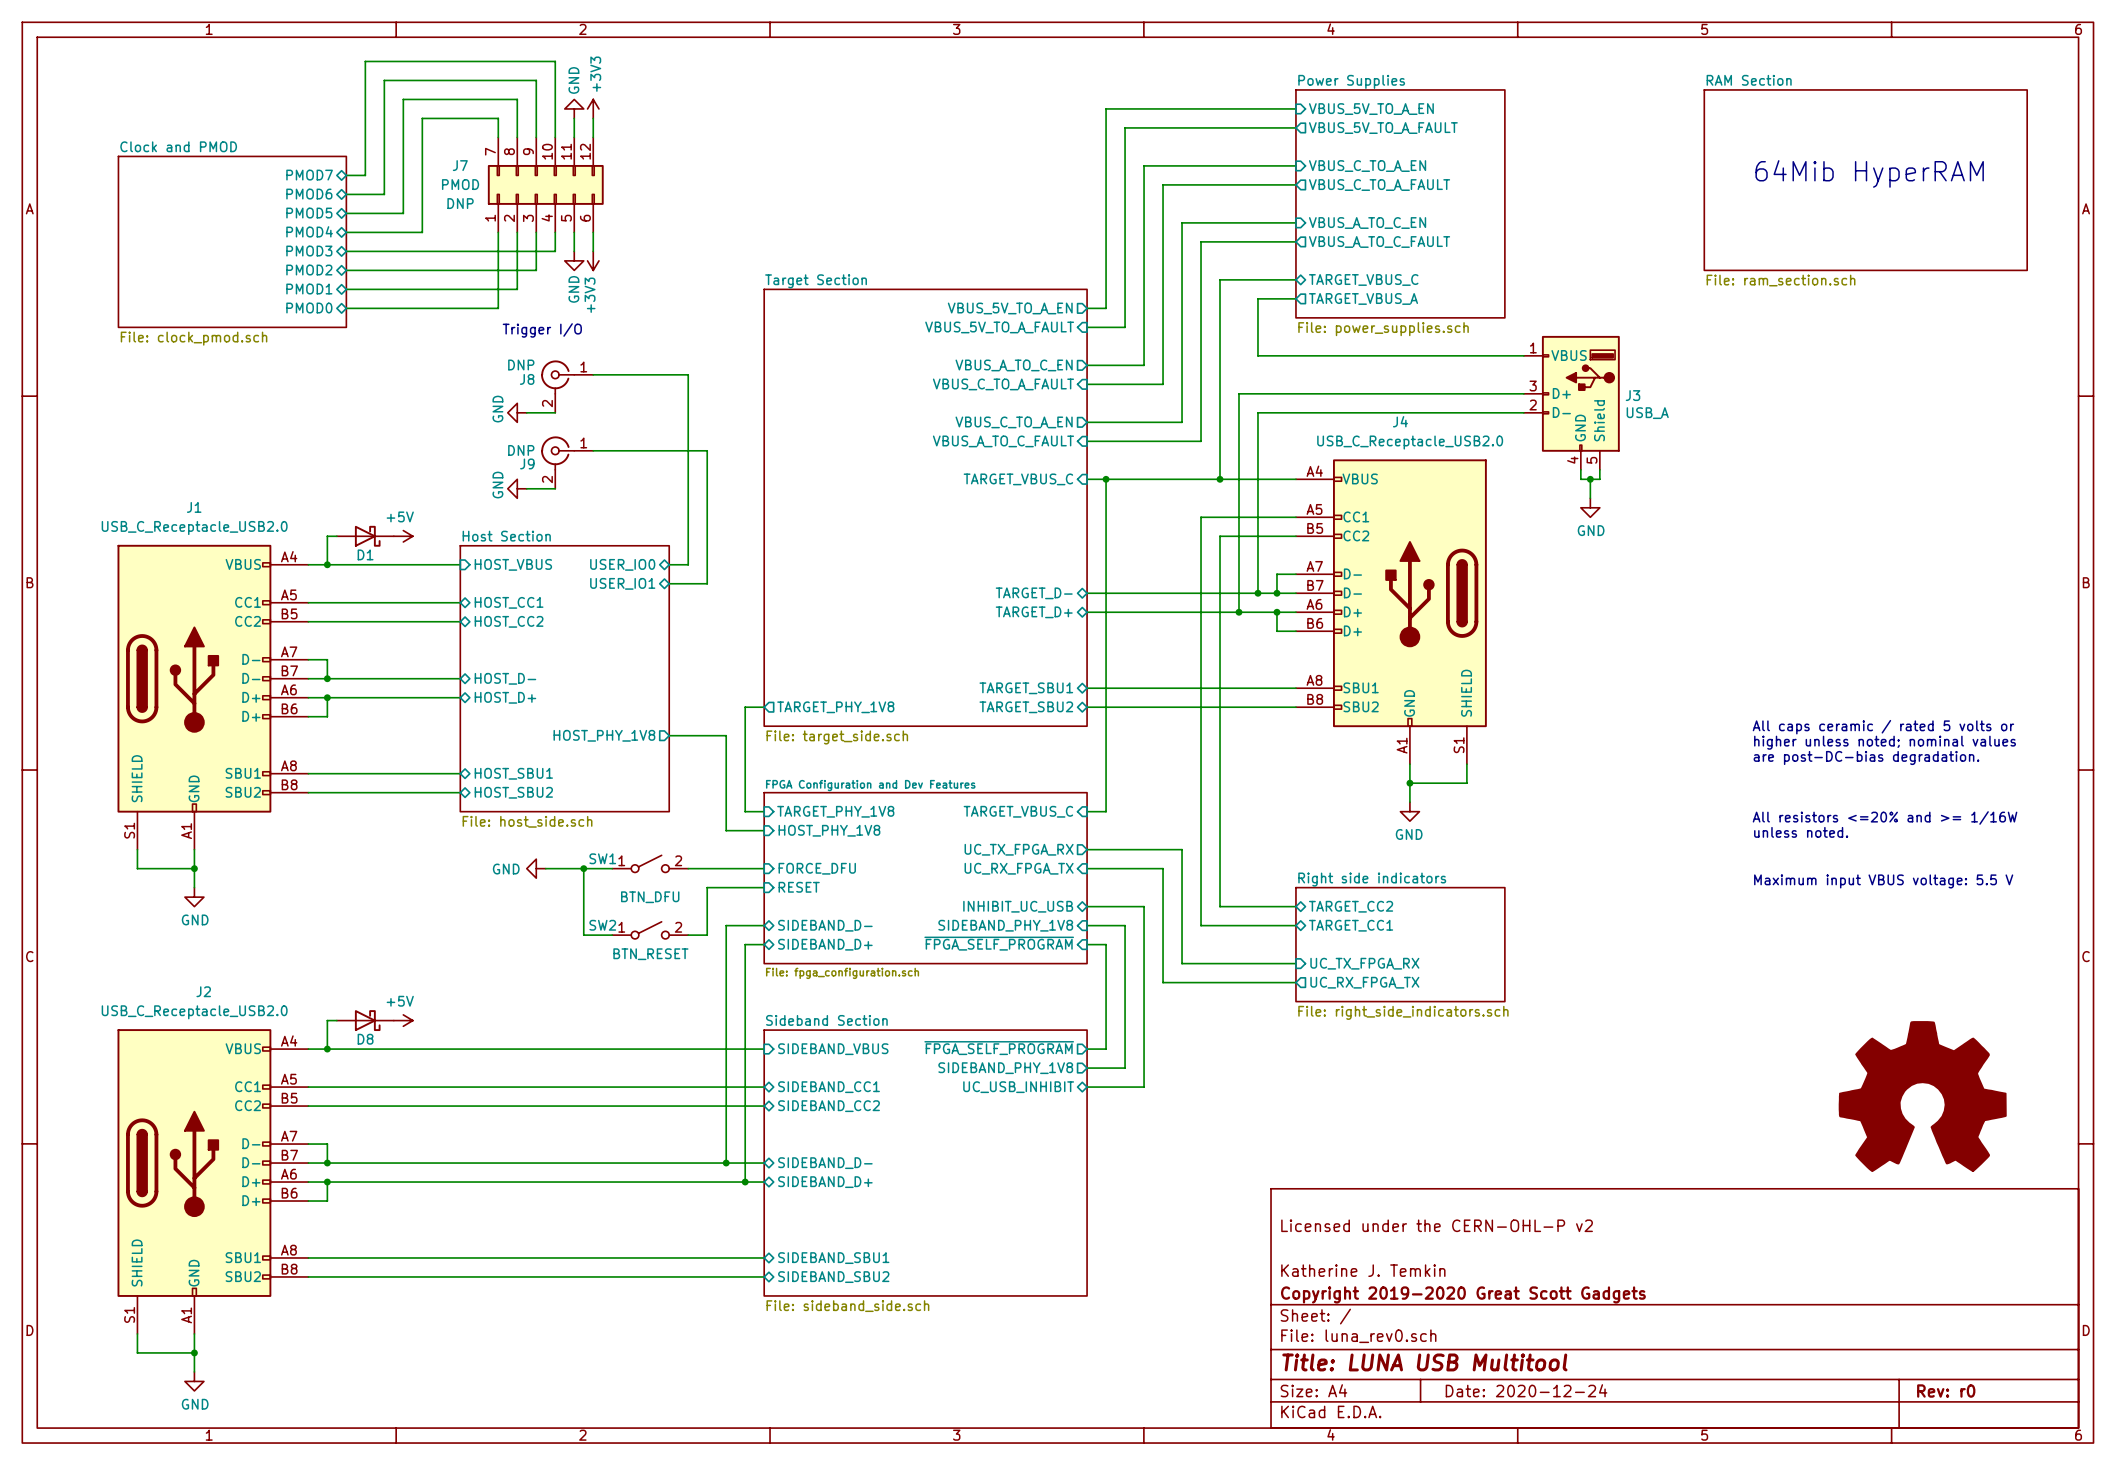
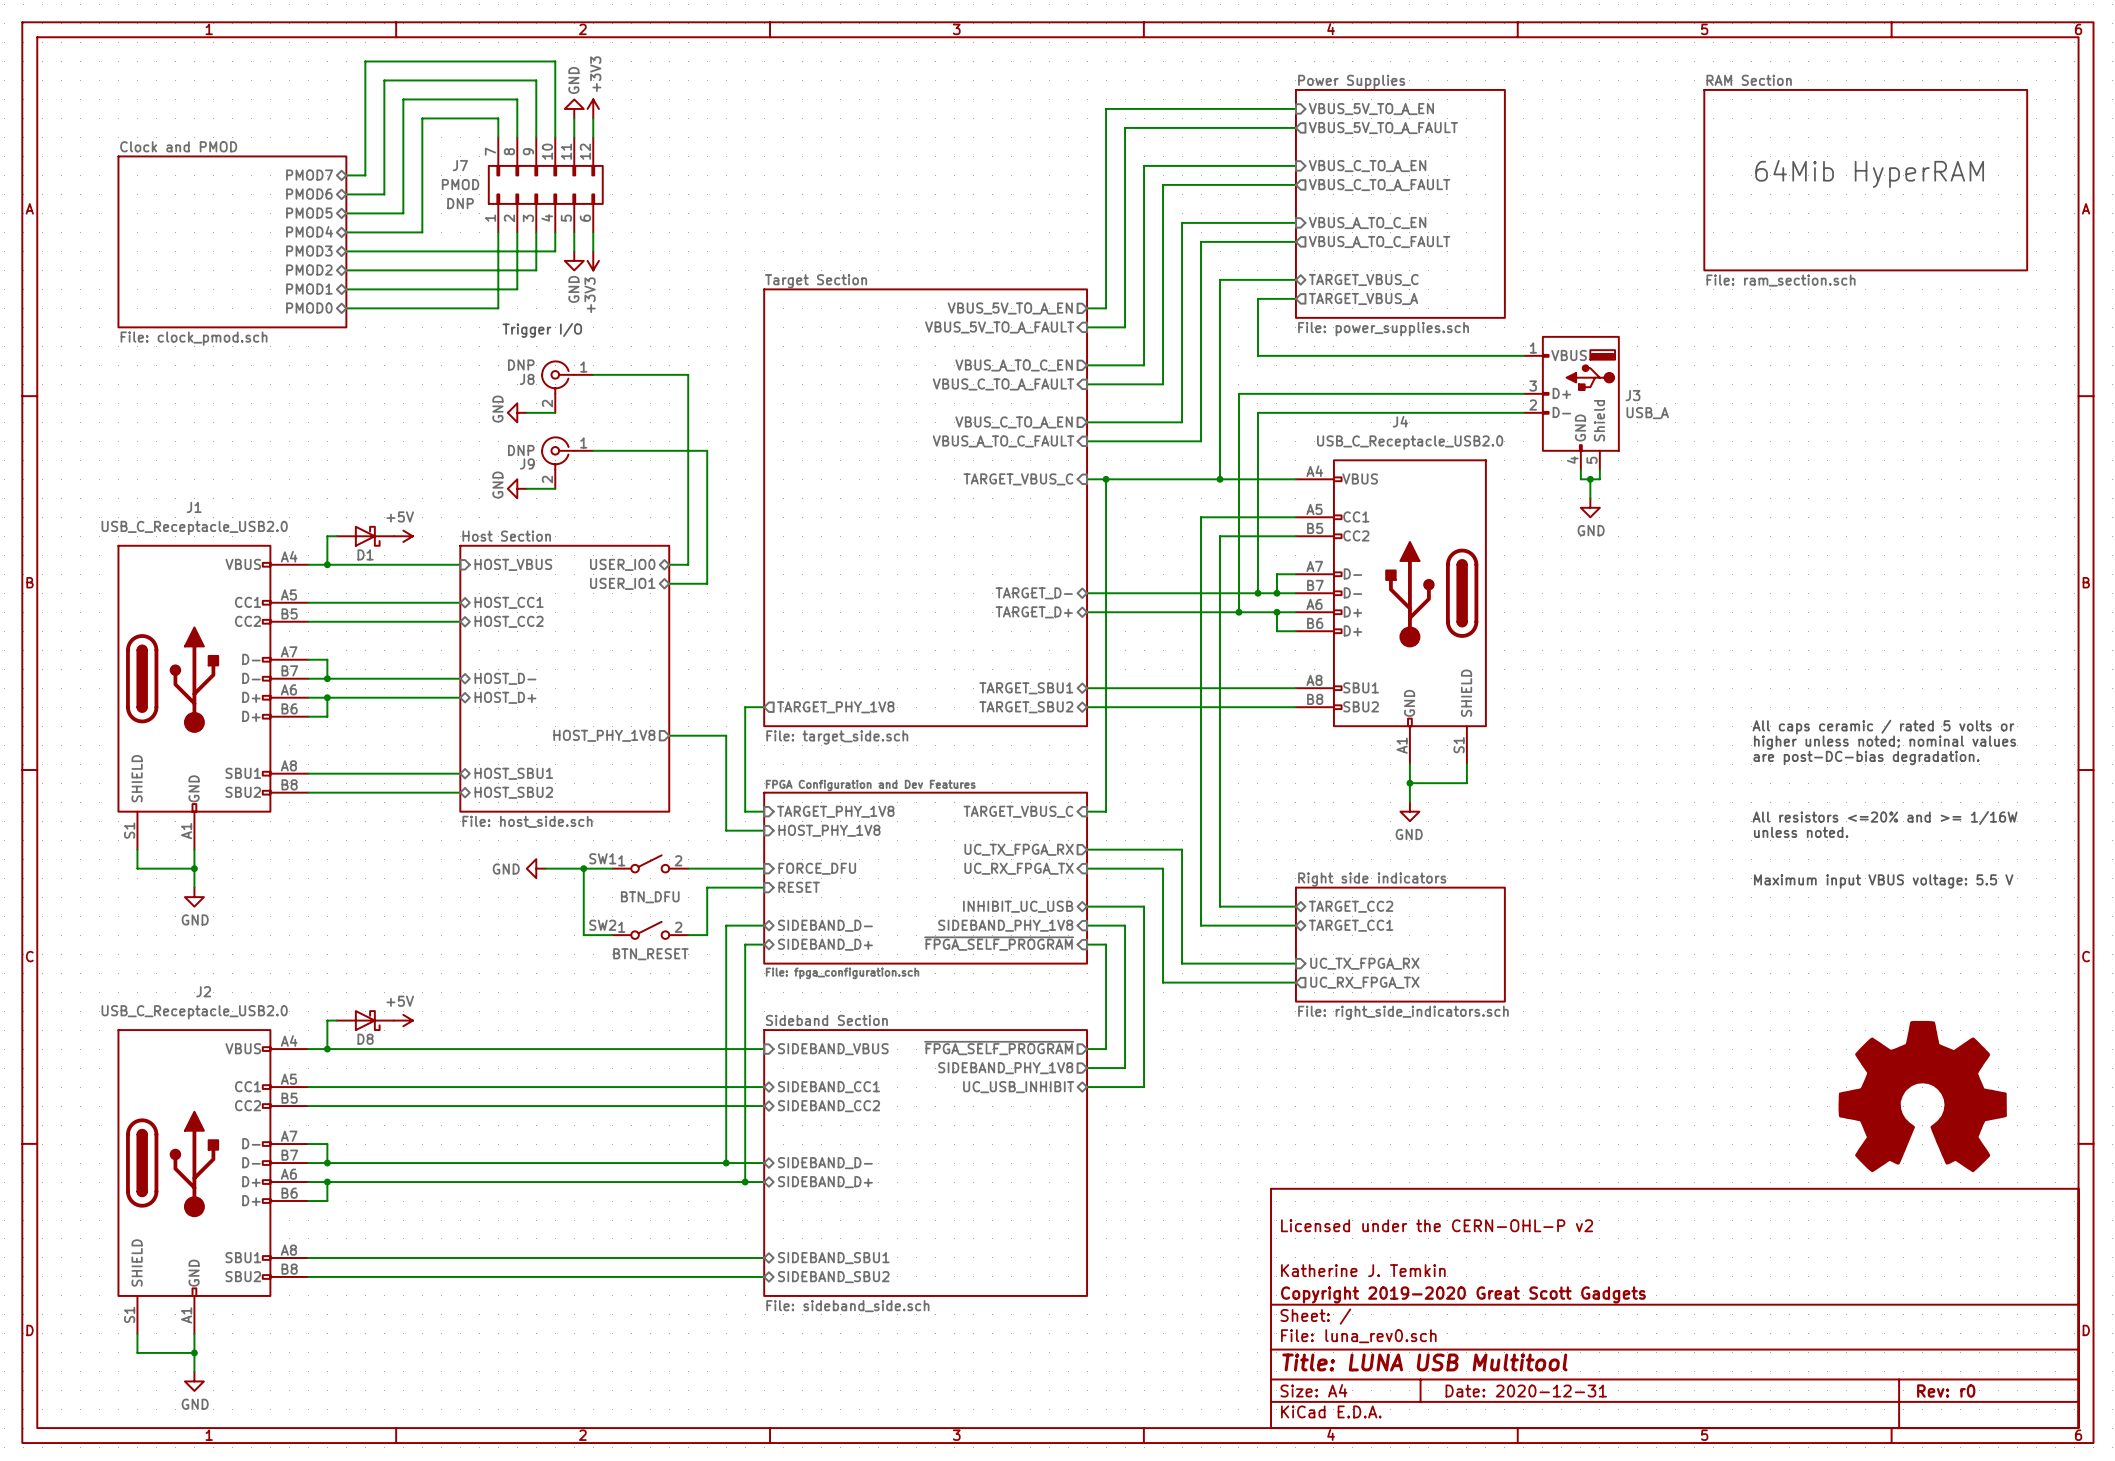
title block: Date: 2020-12-24 (1526, 1390) -> Date: 2020-12-31 (1526, 1391)

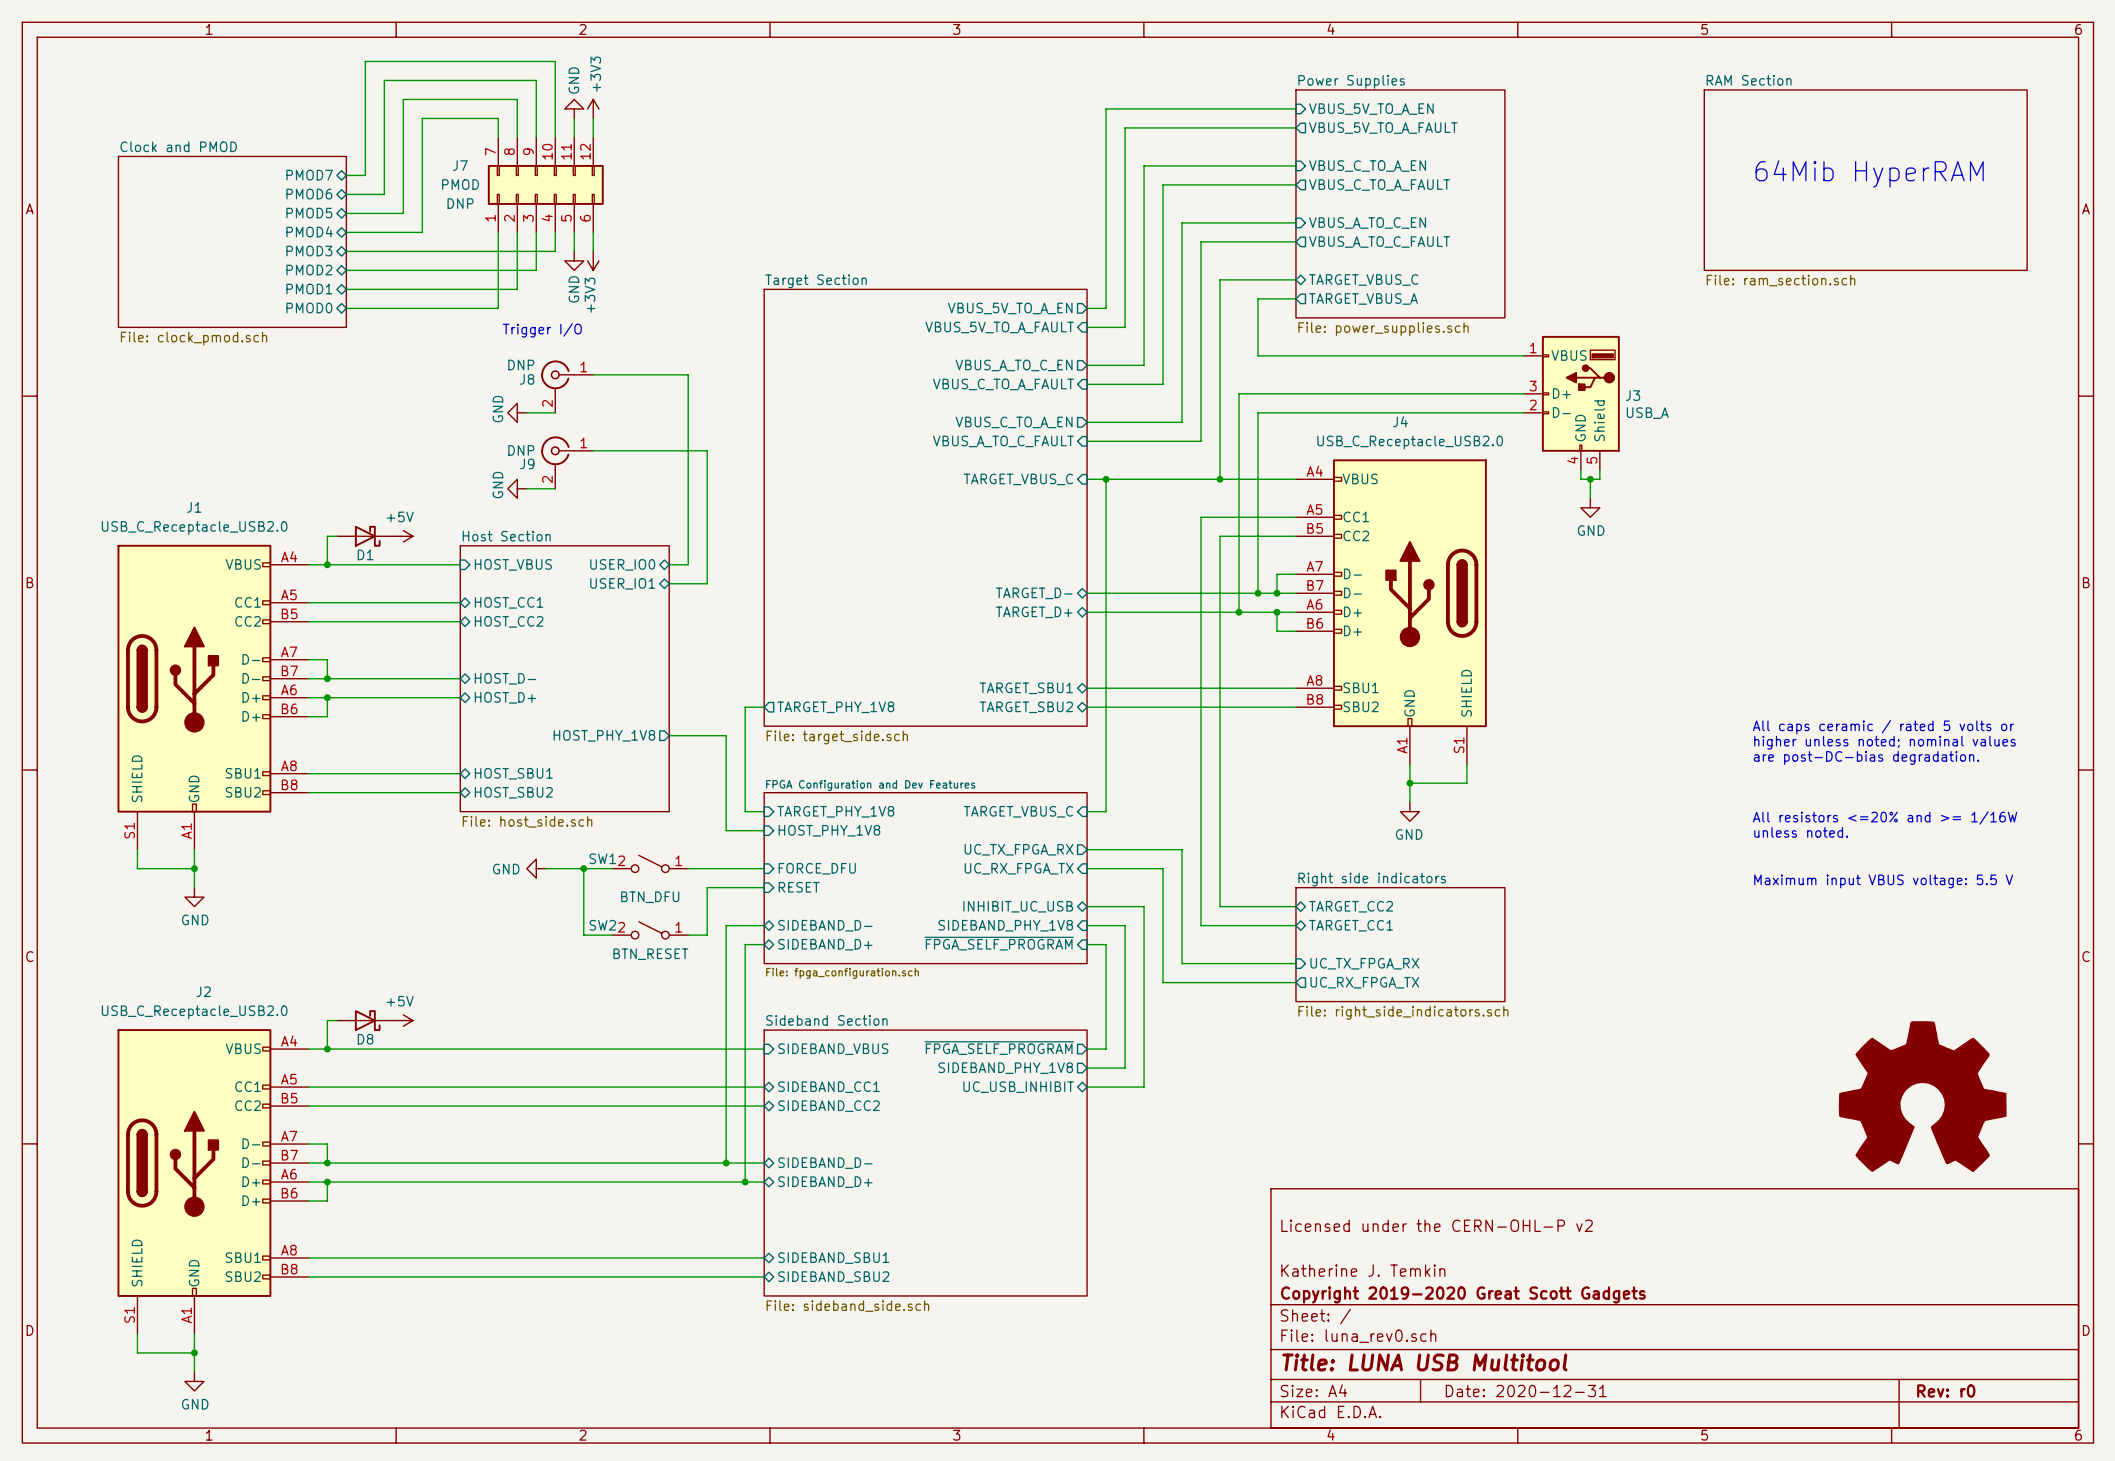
SW1 flip: as is (650, 863) -> left-right (650, 863)
SW2 flip: as is (650, 930) -> left-right (650, 930)

